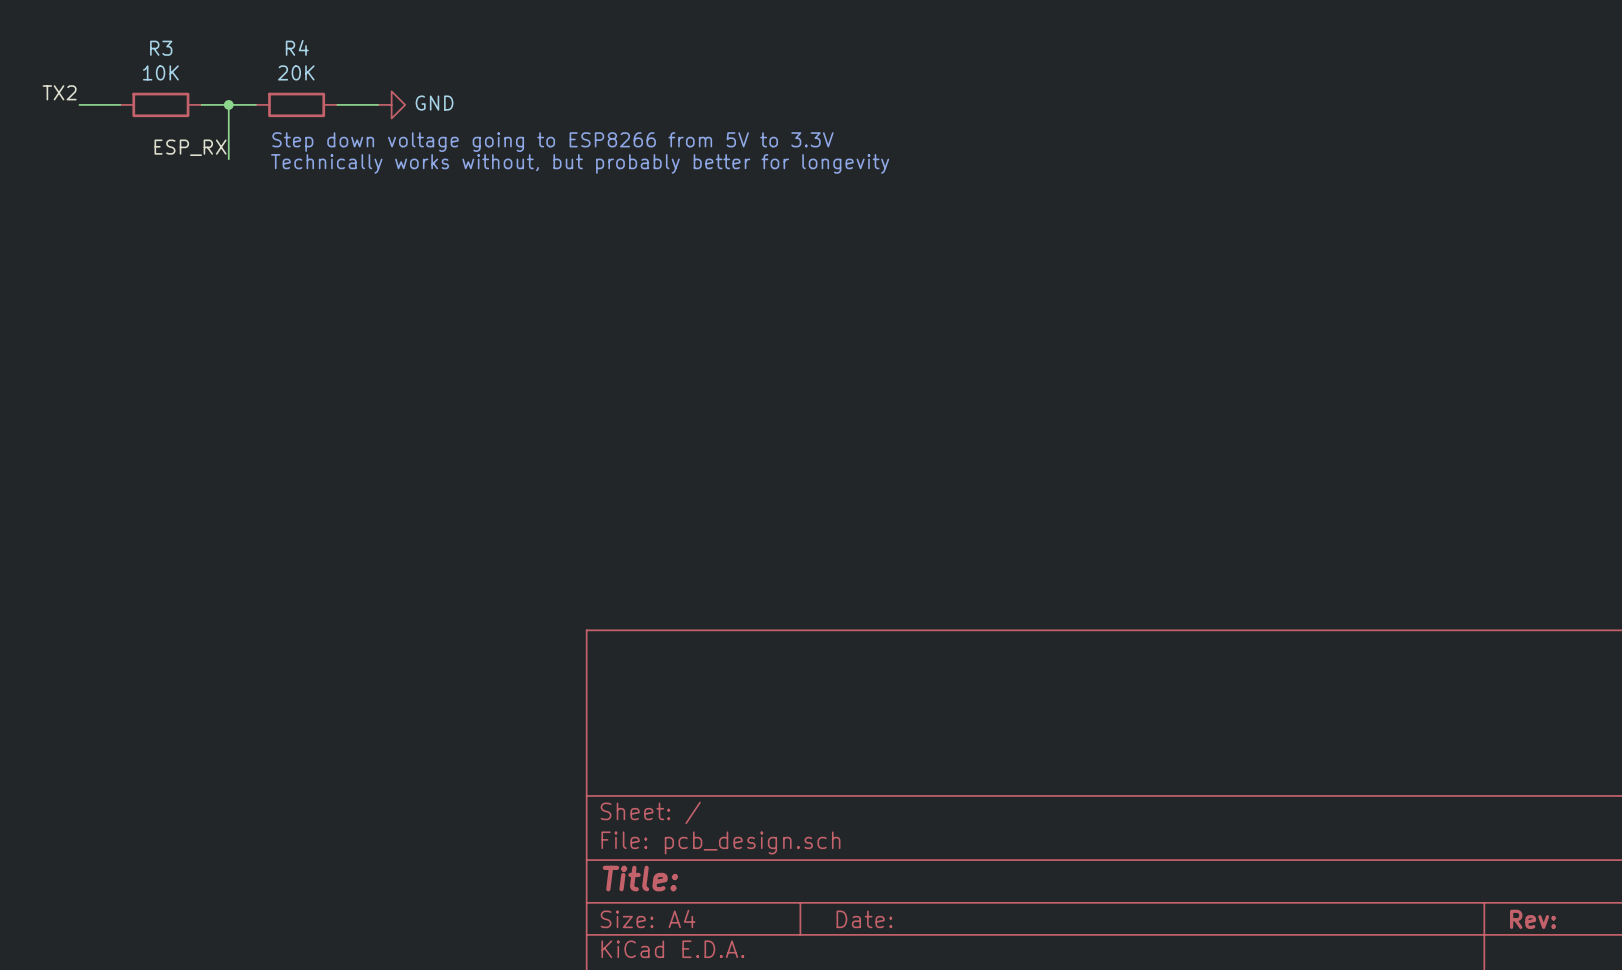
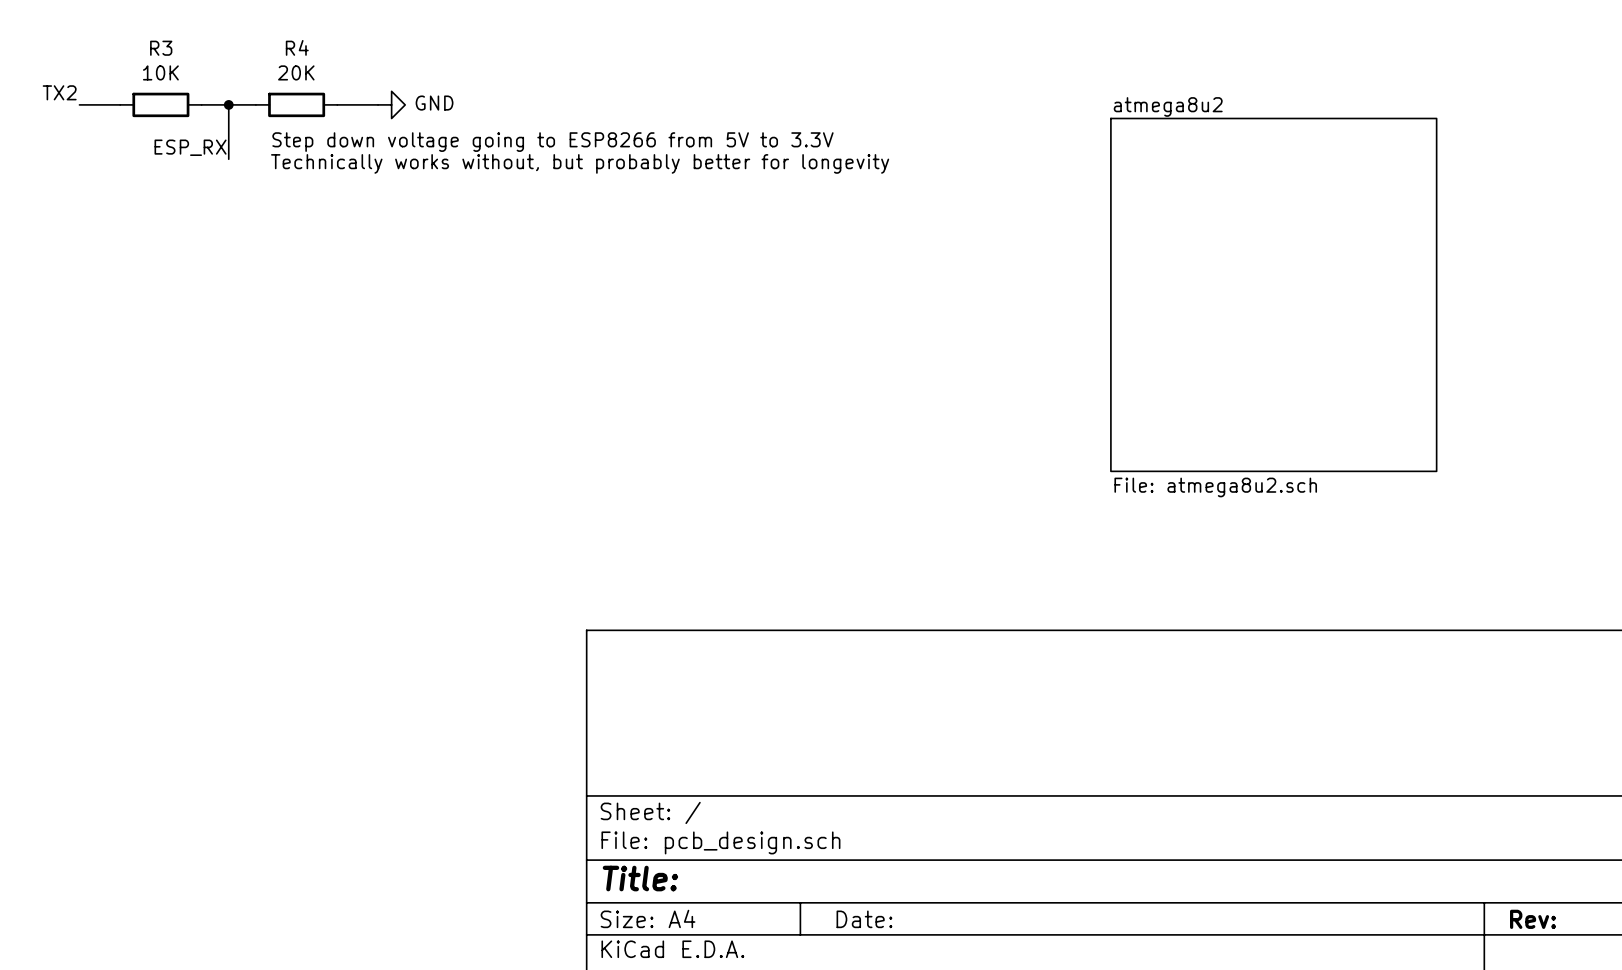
sheet atmega8u2: none -> File: atmega8u2.sch (1273, 294)

